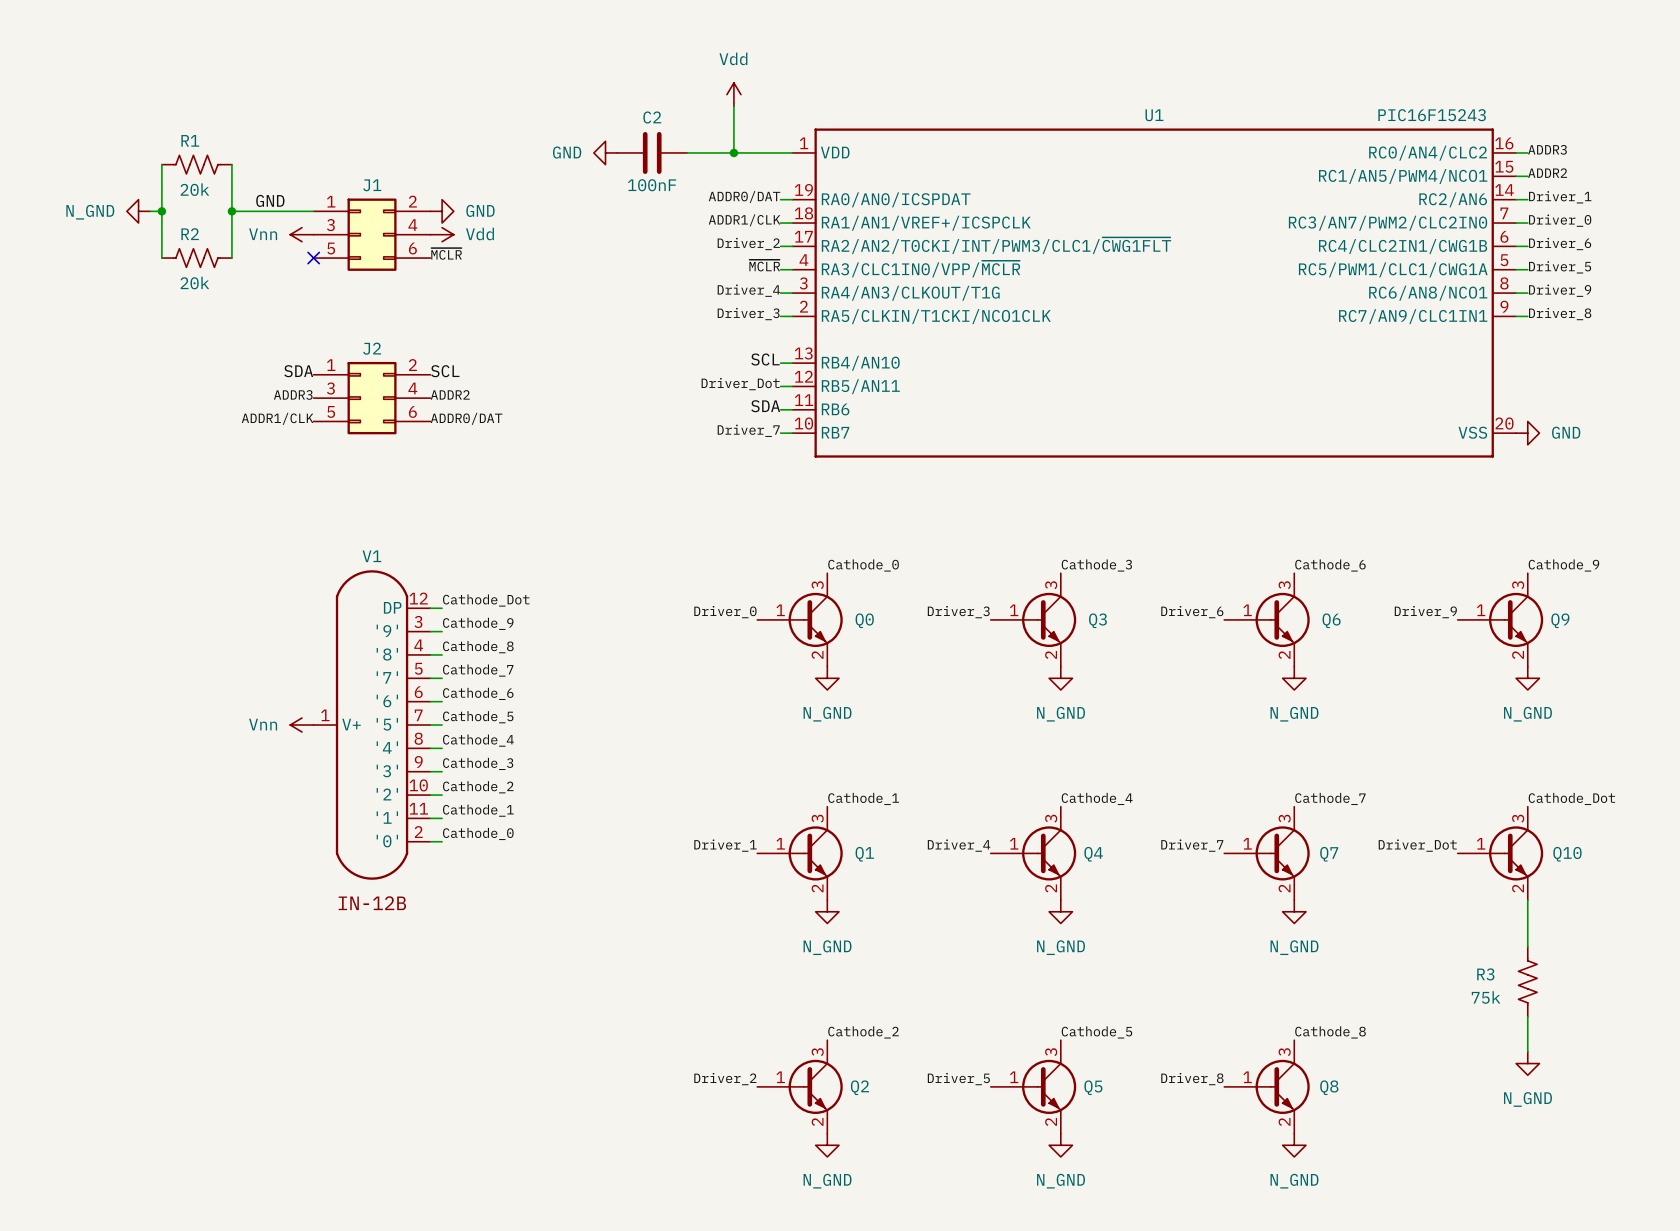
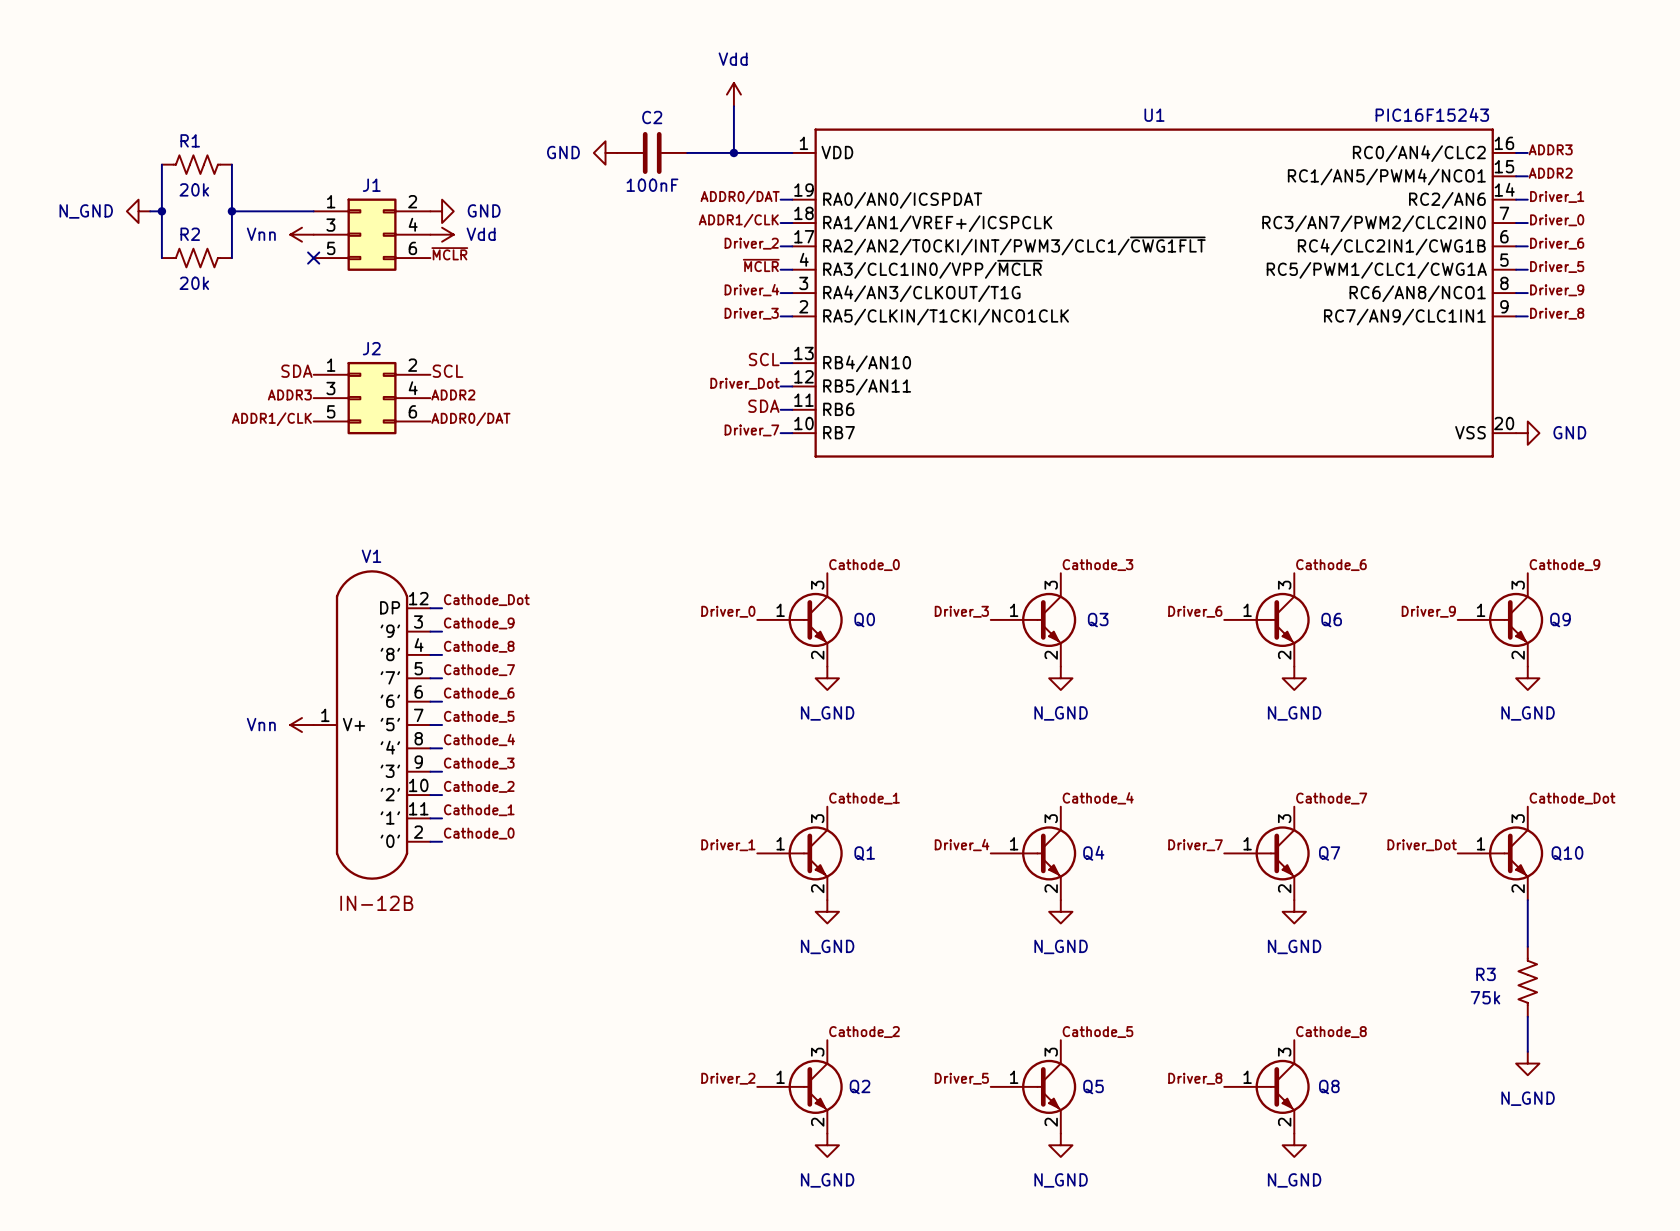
label: GND (270, 200) -> none

